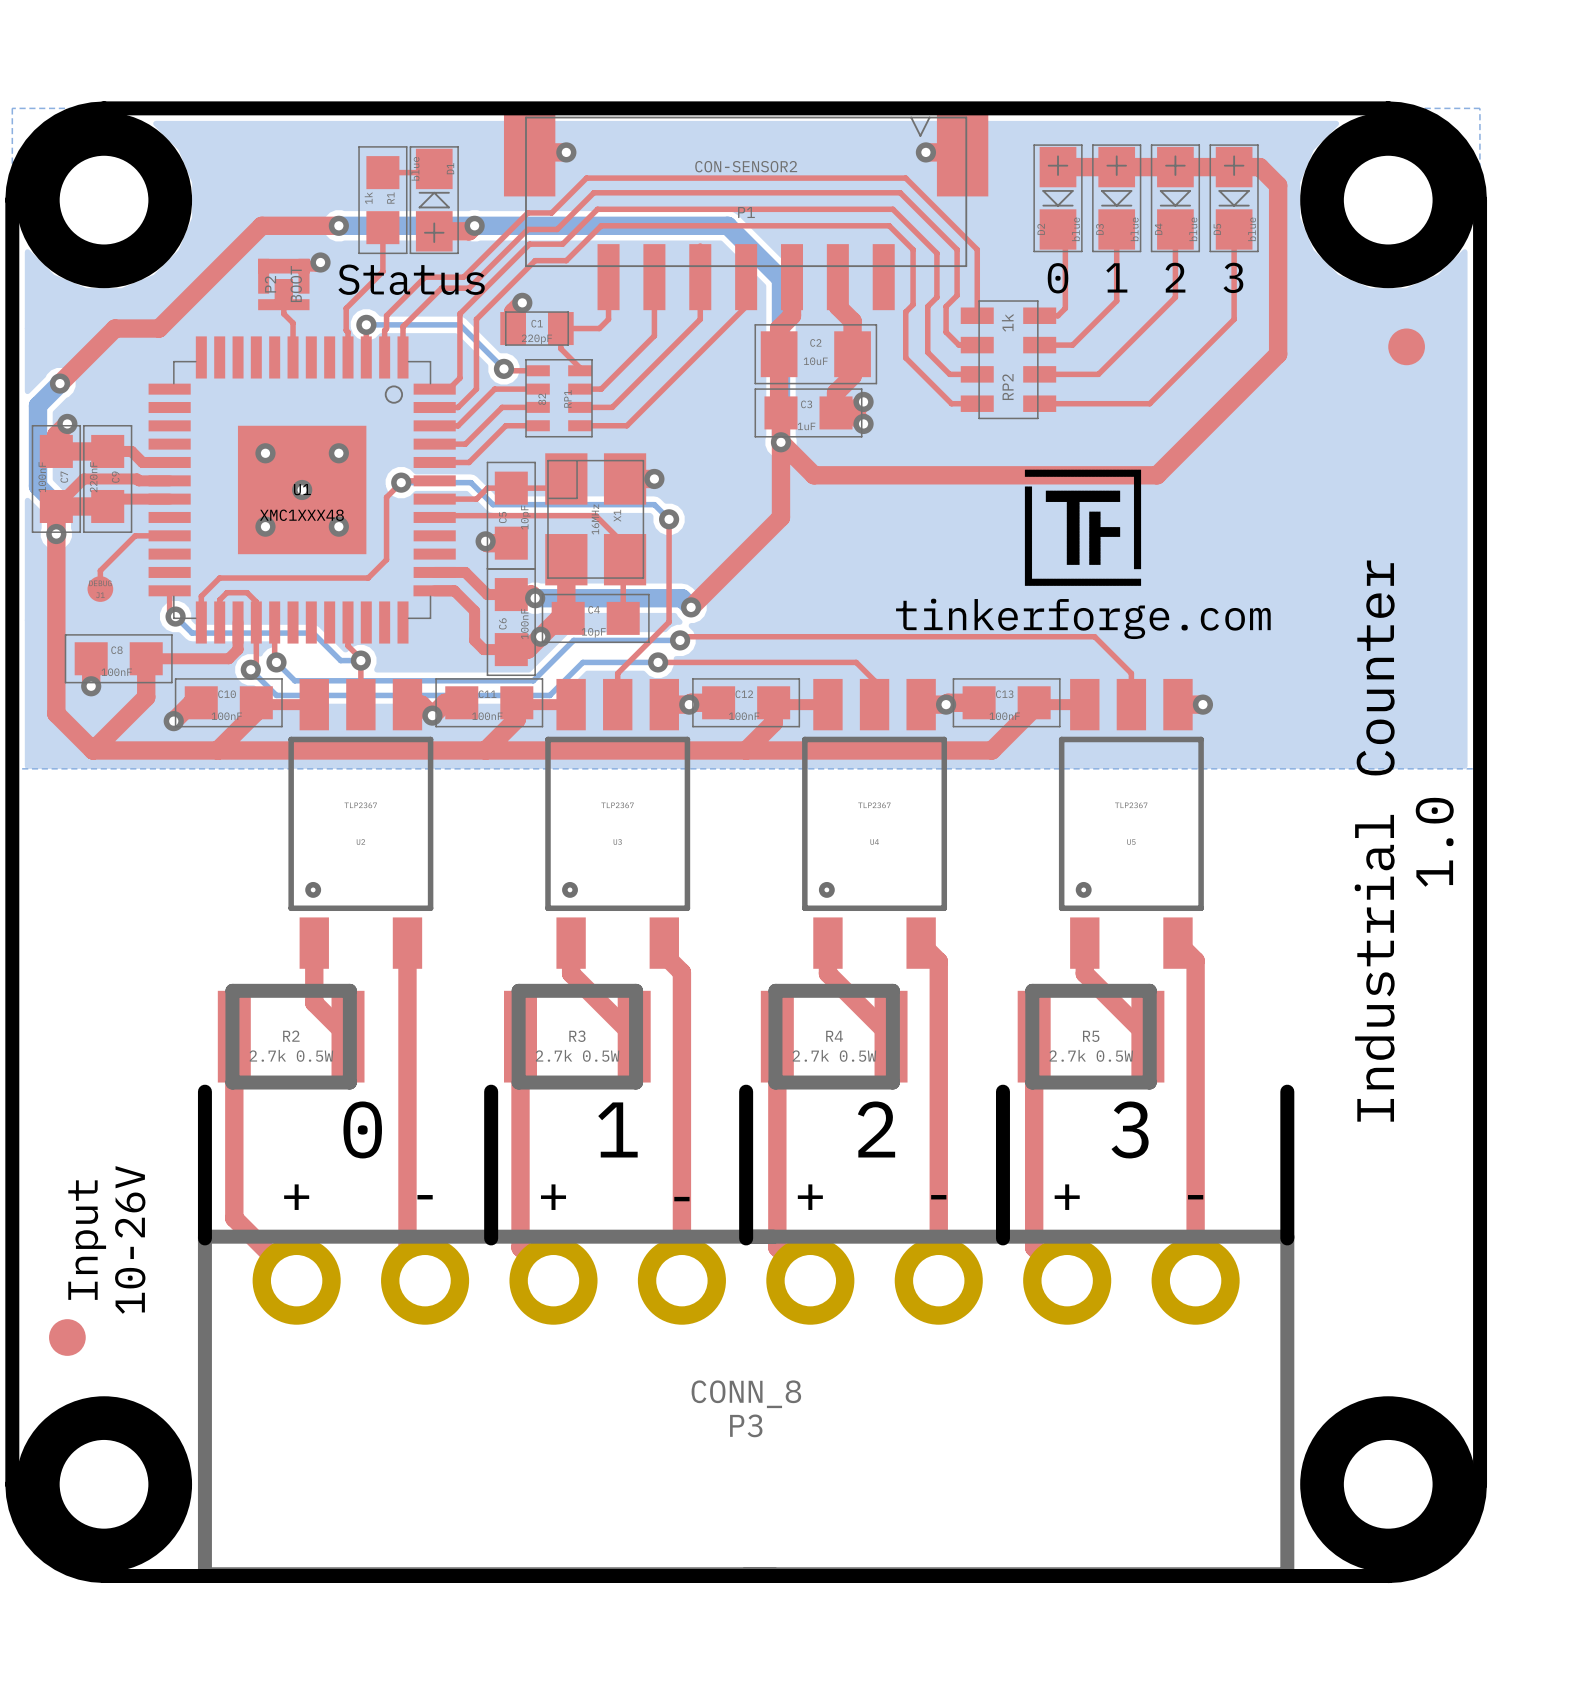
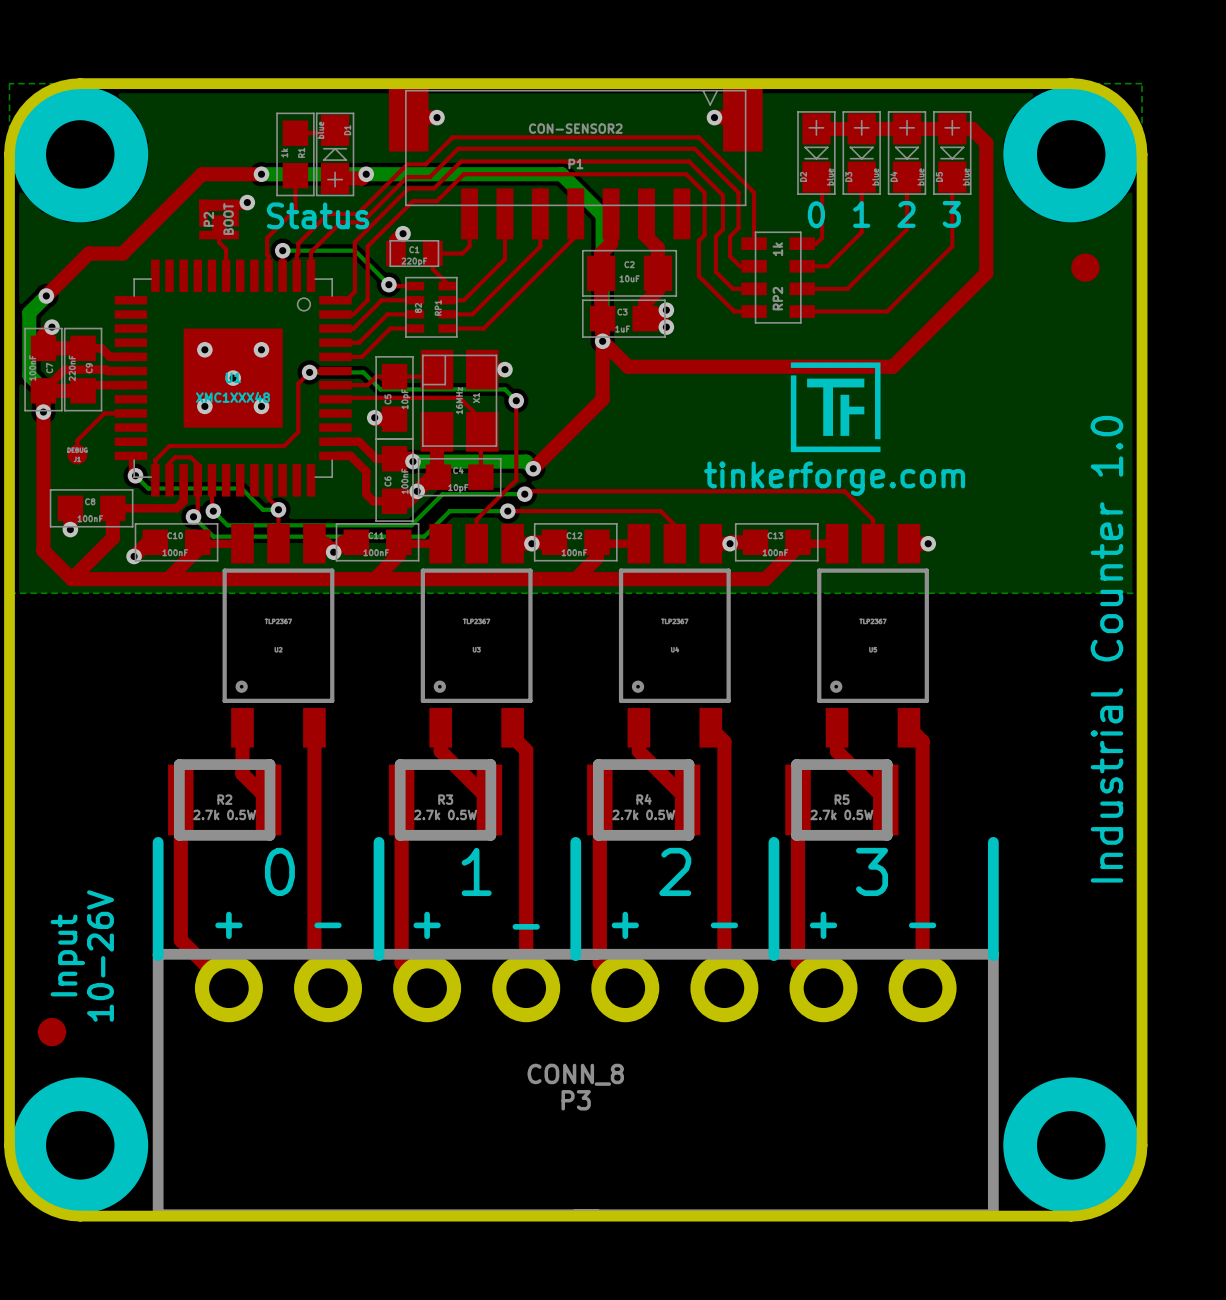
text: Industrial Counter (1374, 841) -> none
text: 1.0 (1434, 842) -> Industrial Counter 1.0 (1106, 649)

